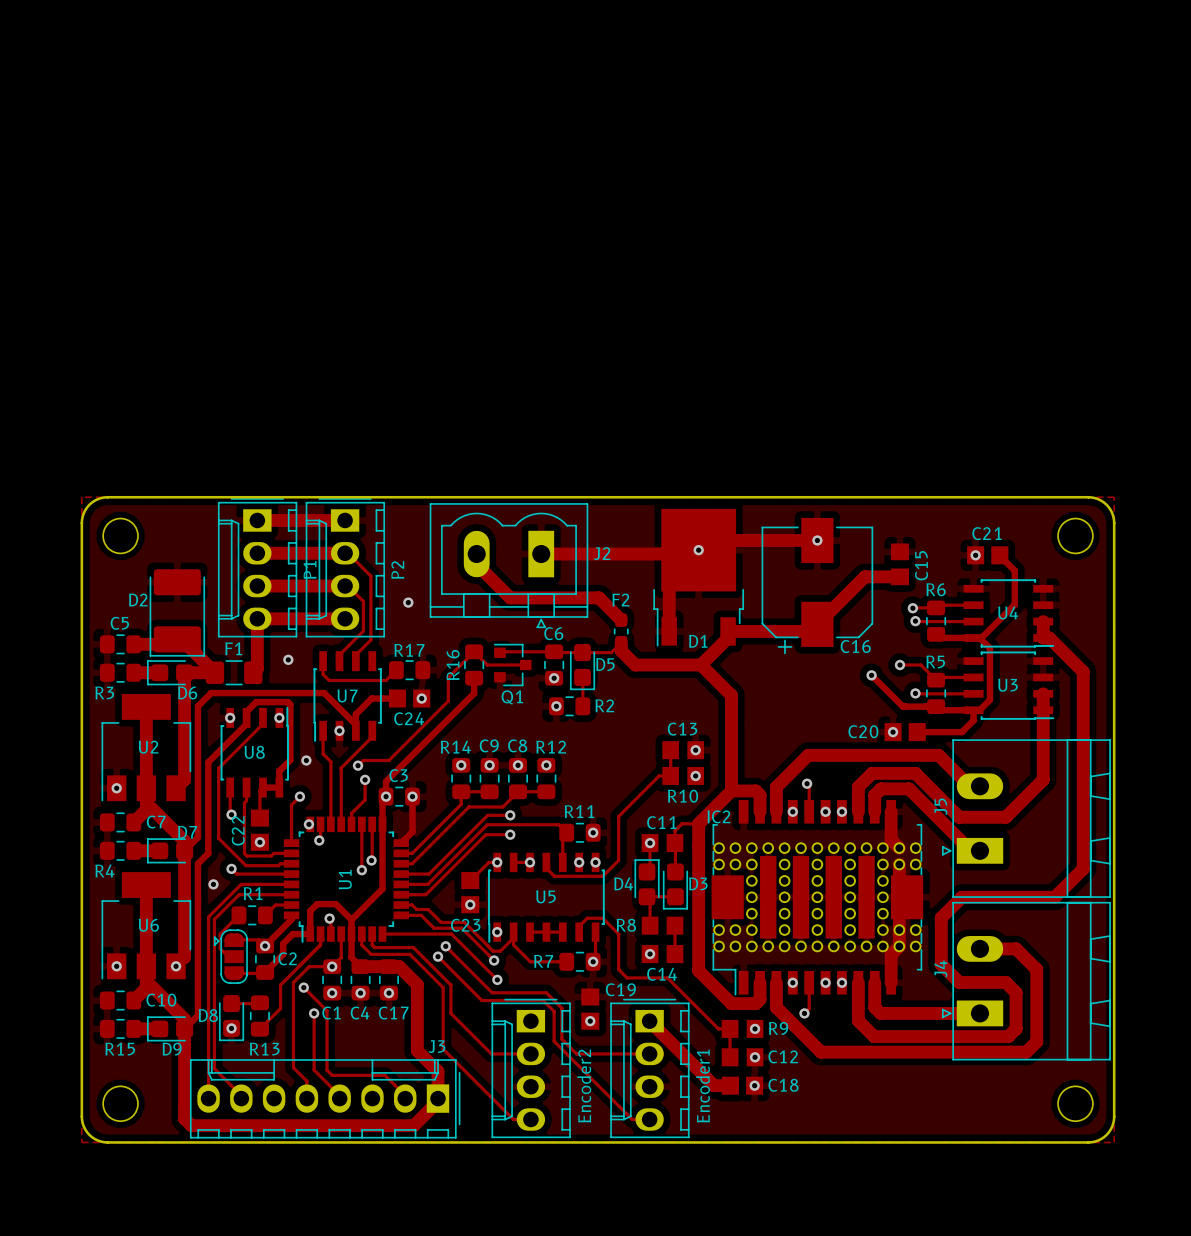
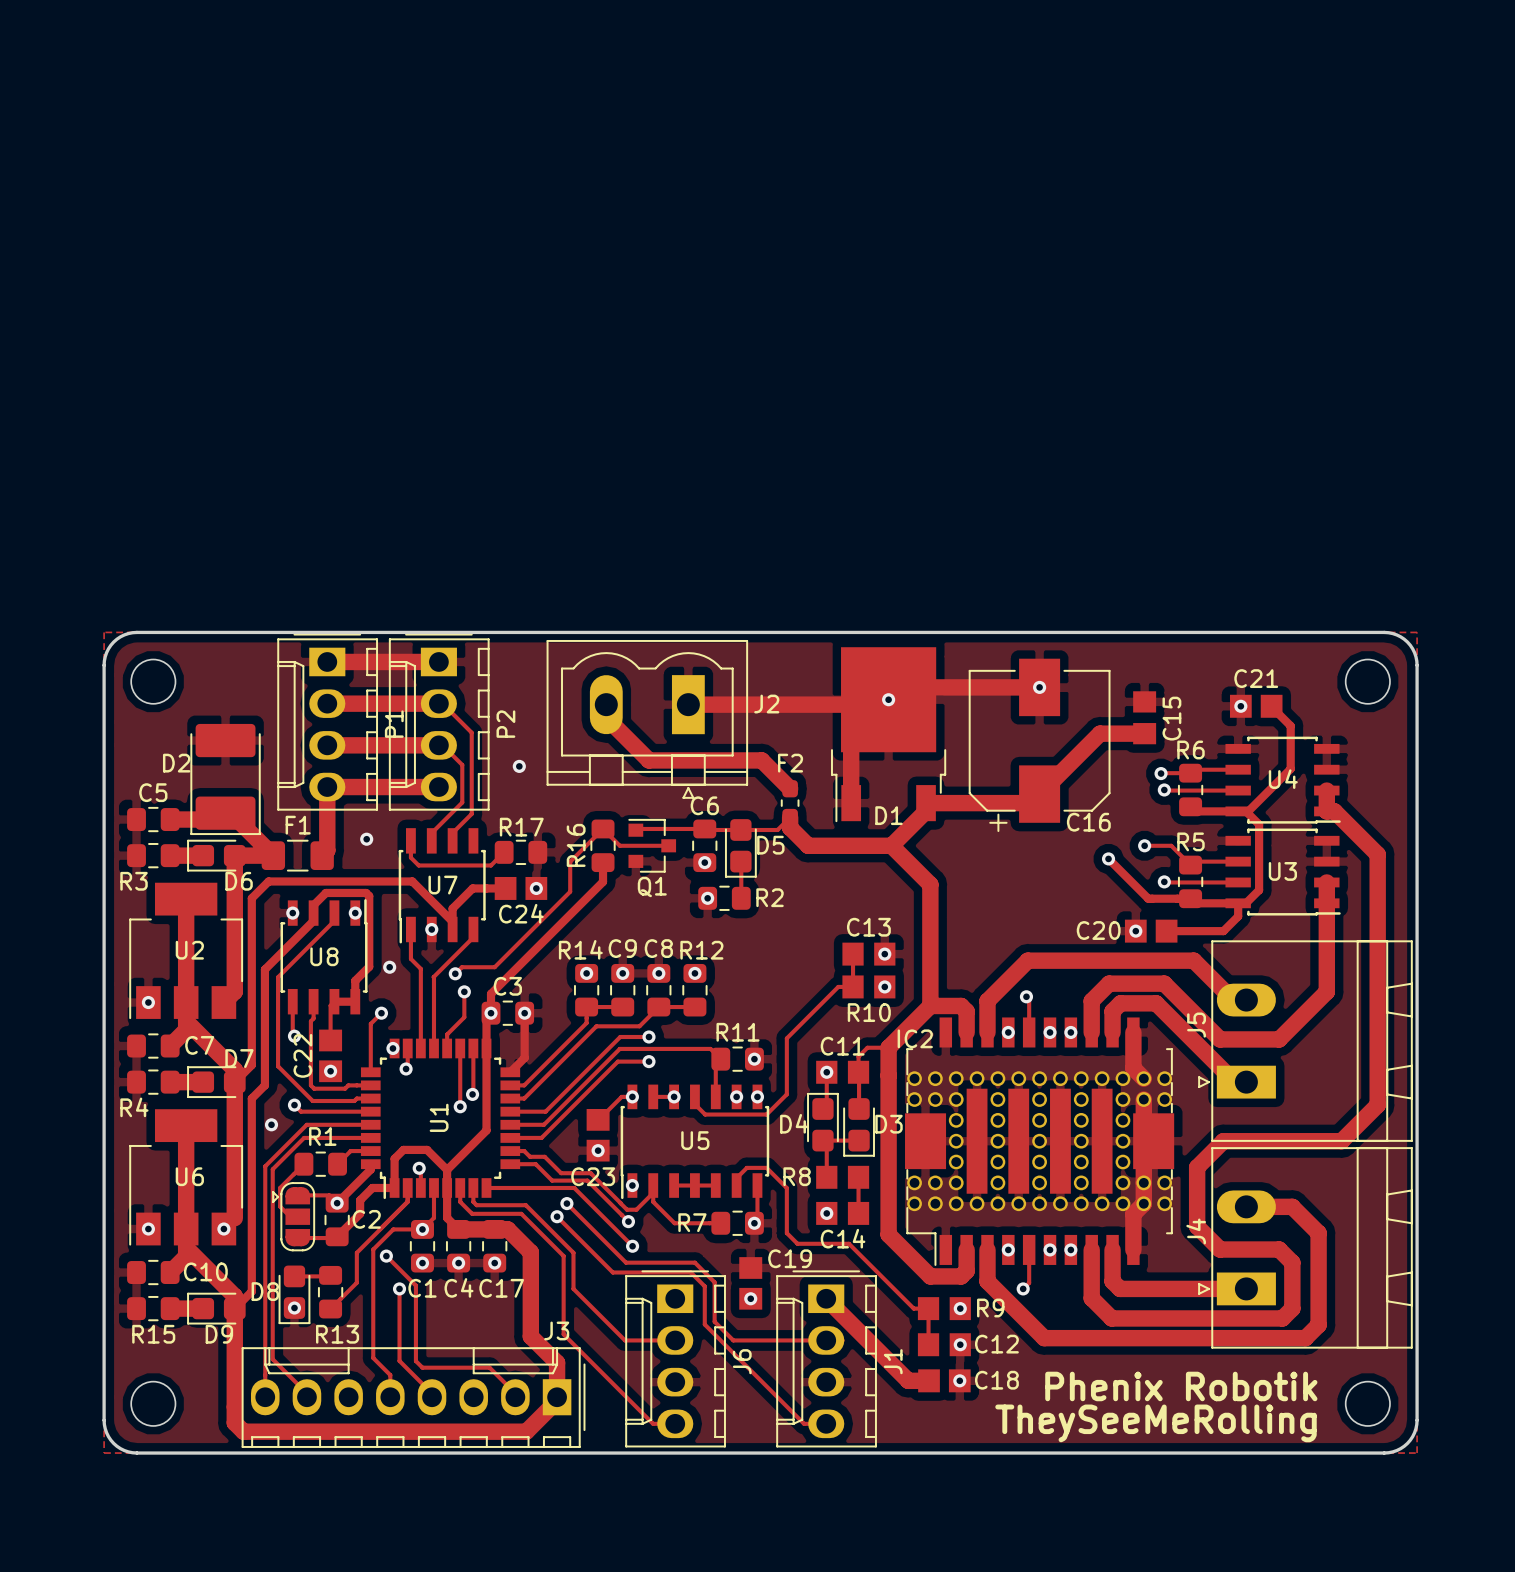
Encoder2 name: Encoder2 (584, 1086) -> J6 (742, 1361)
Encoder1 name: Encoder1 (703, 1086) -> J1 (893, 1361)
text: none -> Phenix Robotik (1181, 1386)
text: none -> TheySeeMeRolling (1156, 1423)

